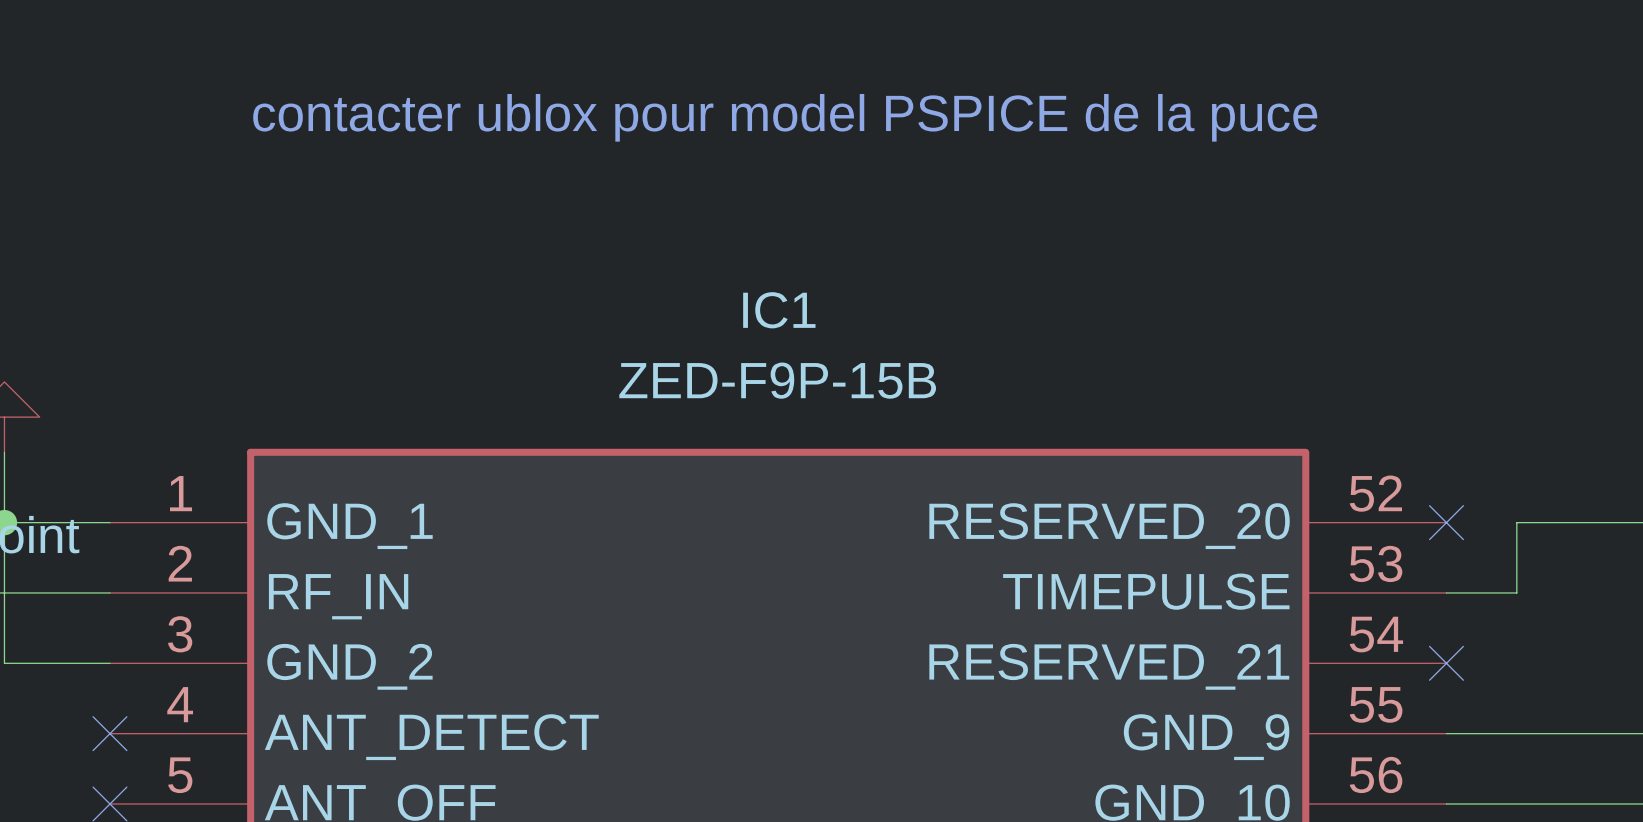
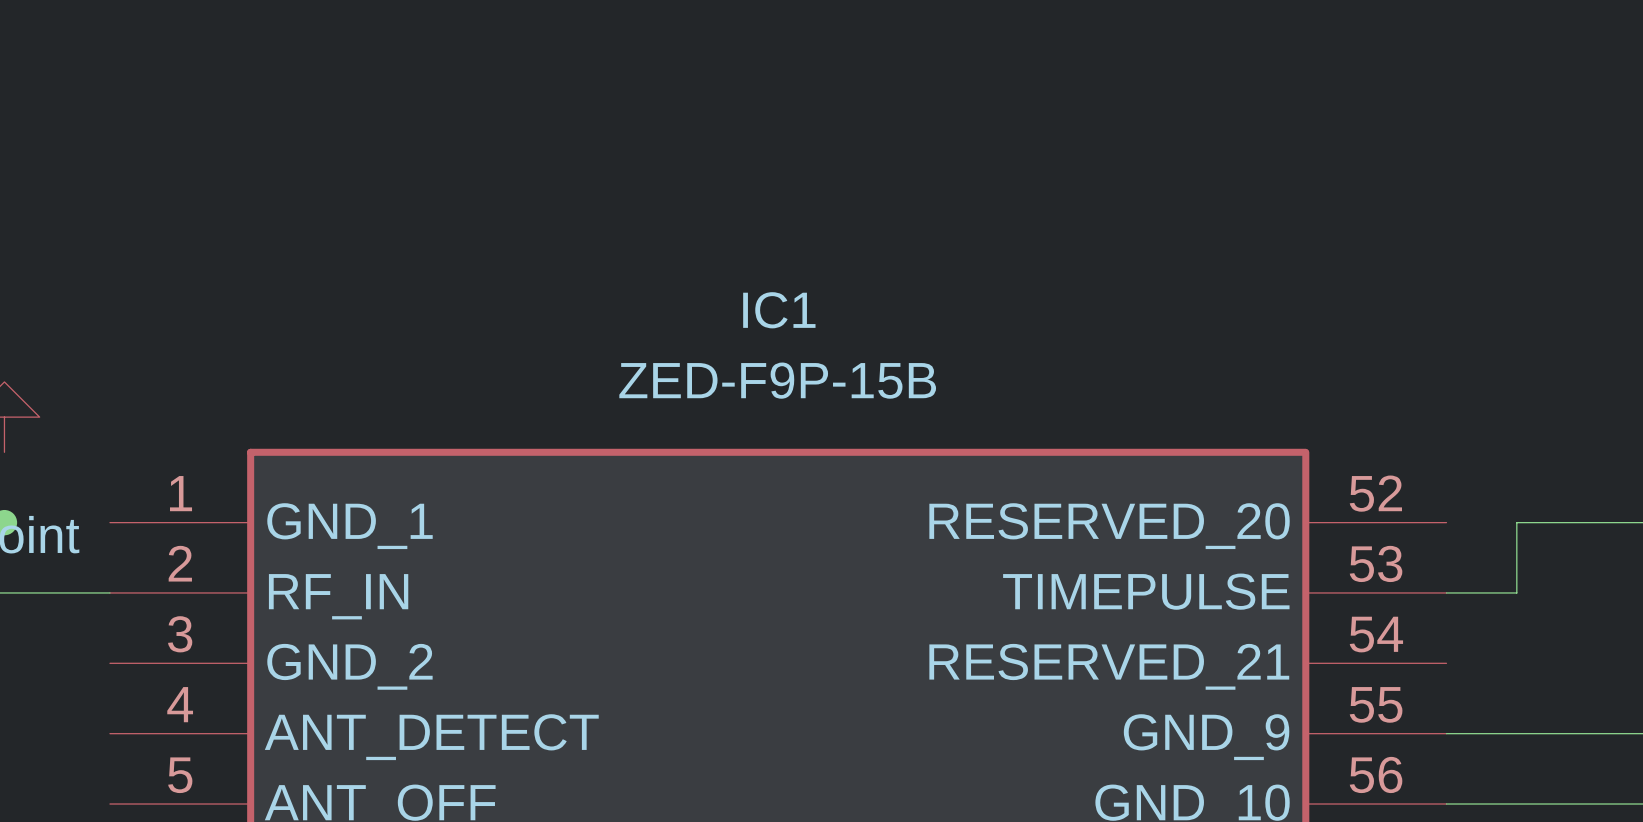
text: contacter ublox pour model PSPICE de la puce (785, 117) -> none
wire: (4, 452) (4, 663) (109, 663) -> none
wire: (4, 522) (109, 522) -> none
no-connect mark: (1446, 522) -> none
no-connect mark: (1446, 663) -> none
no-connect mark: (109, 733) -> none
no-connect mark: (109, 804) -> none

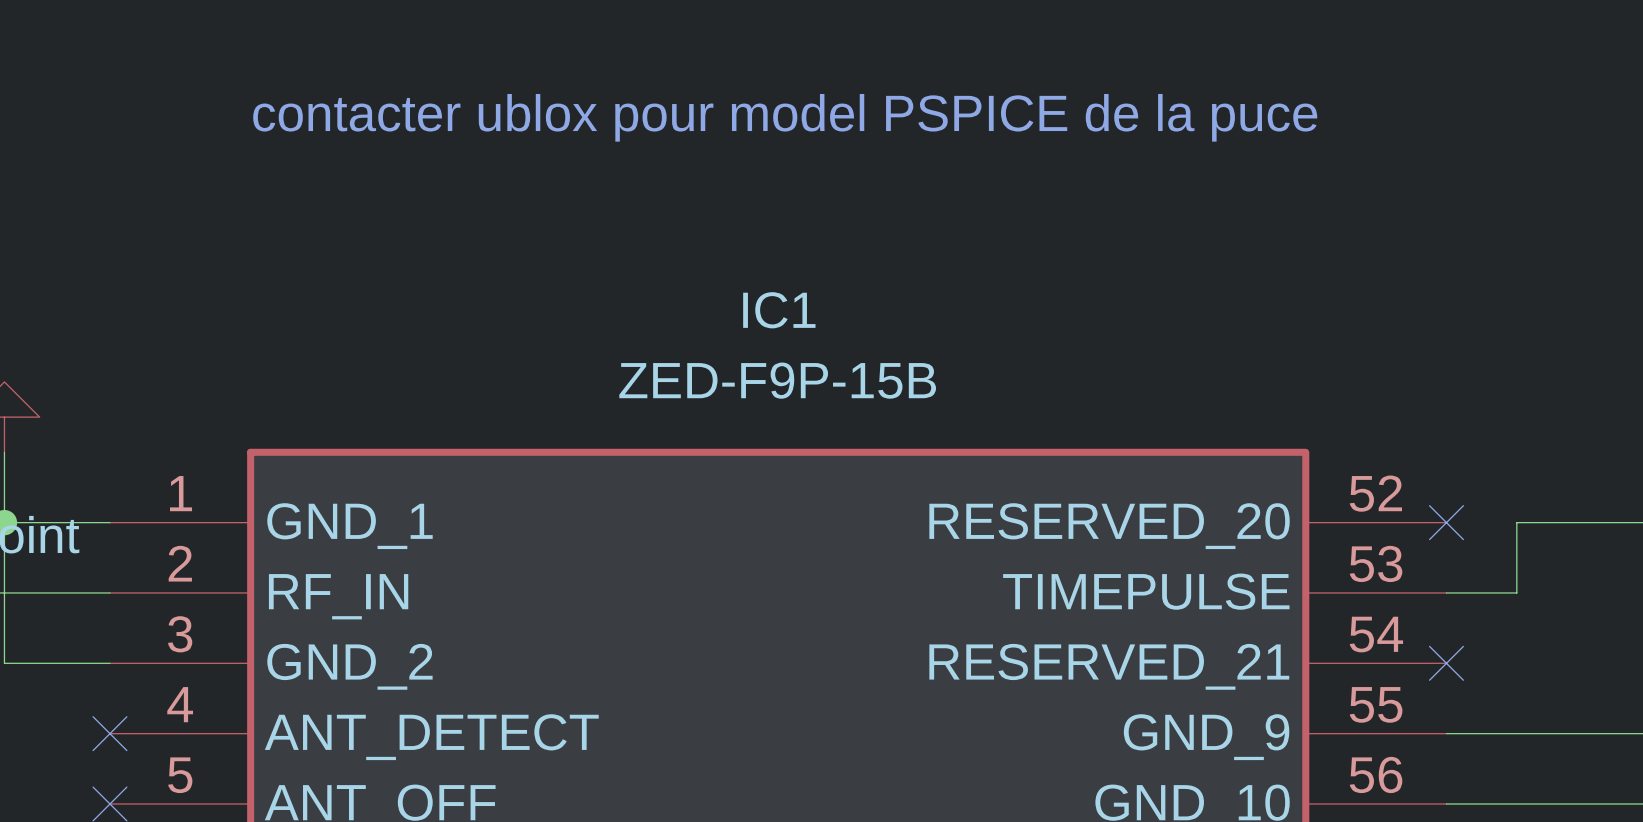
text: none -> contacter ublox pour model PSPICE de la puce (785, 117)
wire: none -> (4, 452) (4, 663) (109, 663)
wire: none -> (4, 522) (109, 522)
no-connect mark: none -> (1446, 522)
no-connect mark: none -> (1446, 663)
no-connect mark: none -> (109, 733)
no-connect mark: none -> (109, 804)

